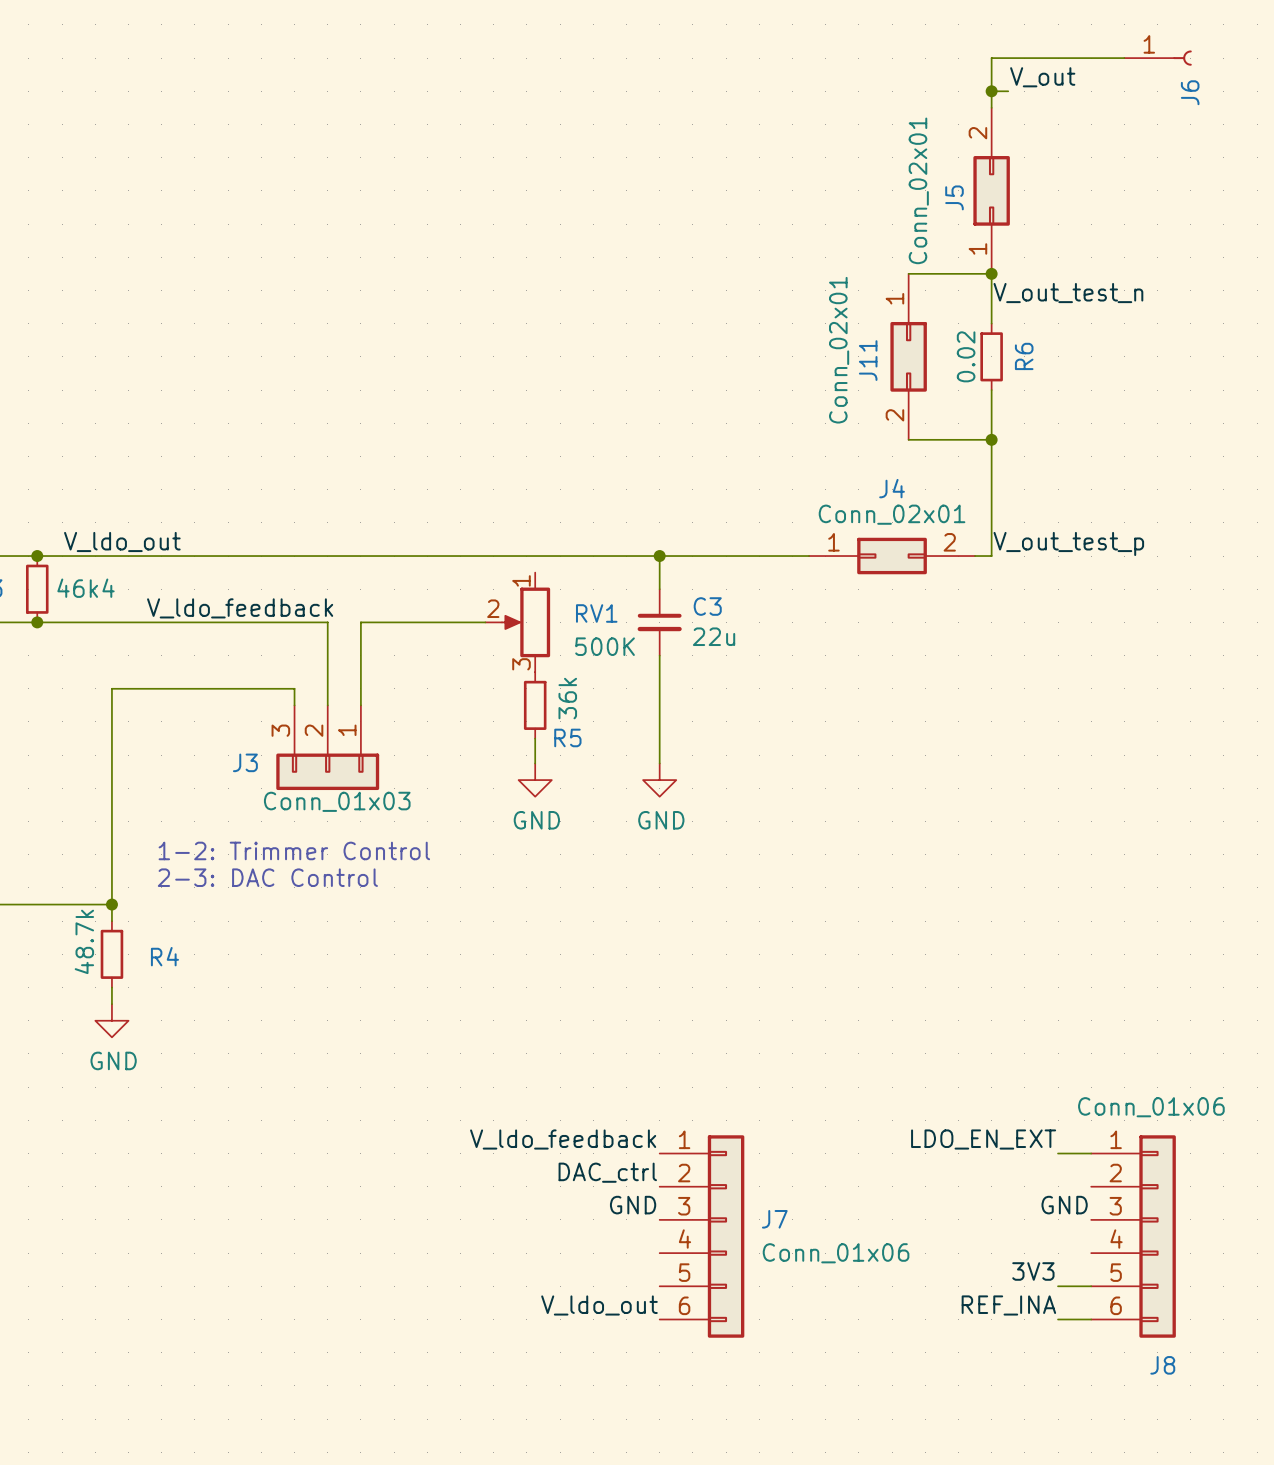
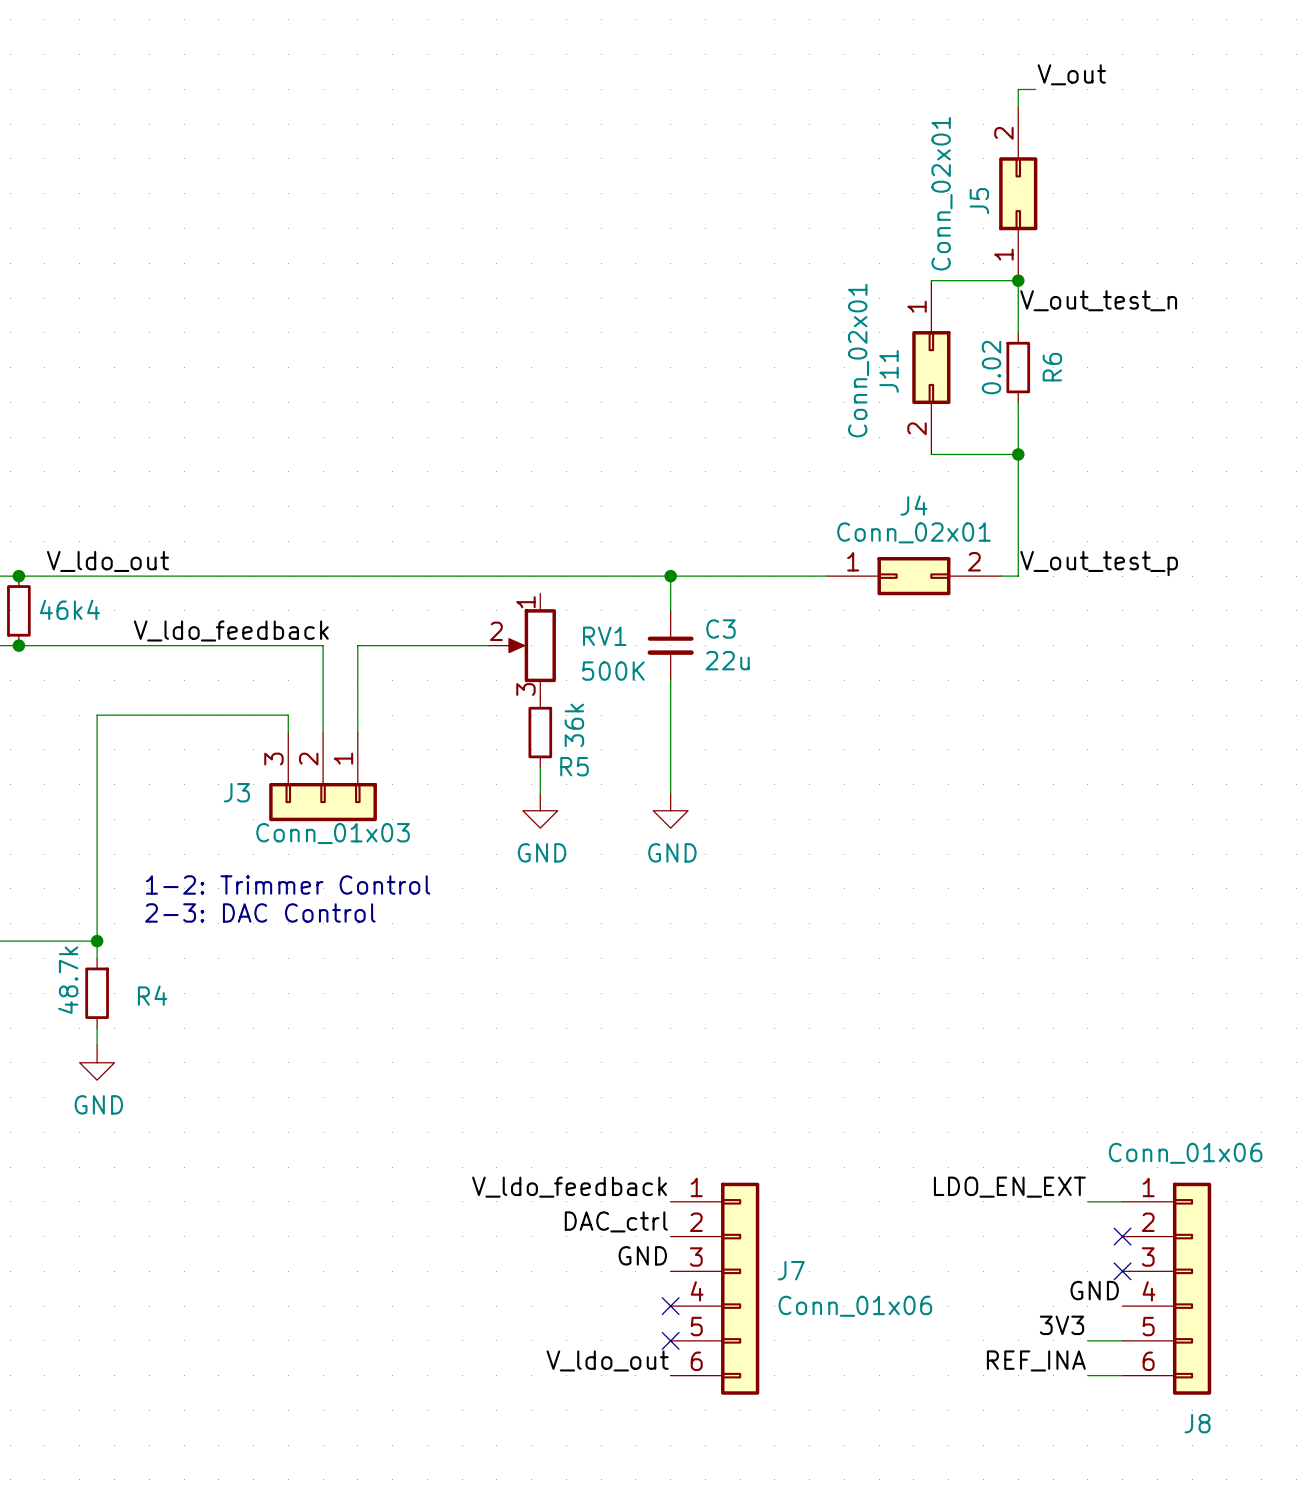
wire: (1124, 58) (991, 58) (991, 91) -> none
J6: (1158, 58) -> none
junction: (991, 91) -> none
no-connect mark: none -> (1122, 1236)
label position: GND (1064, 1205) -> GND (1094, 1290)
no-connect mark: none -> (1122, 1271)
no-connect mark: none -> (670, 1306)
no-connect mark: none -> (670, 1340)

